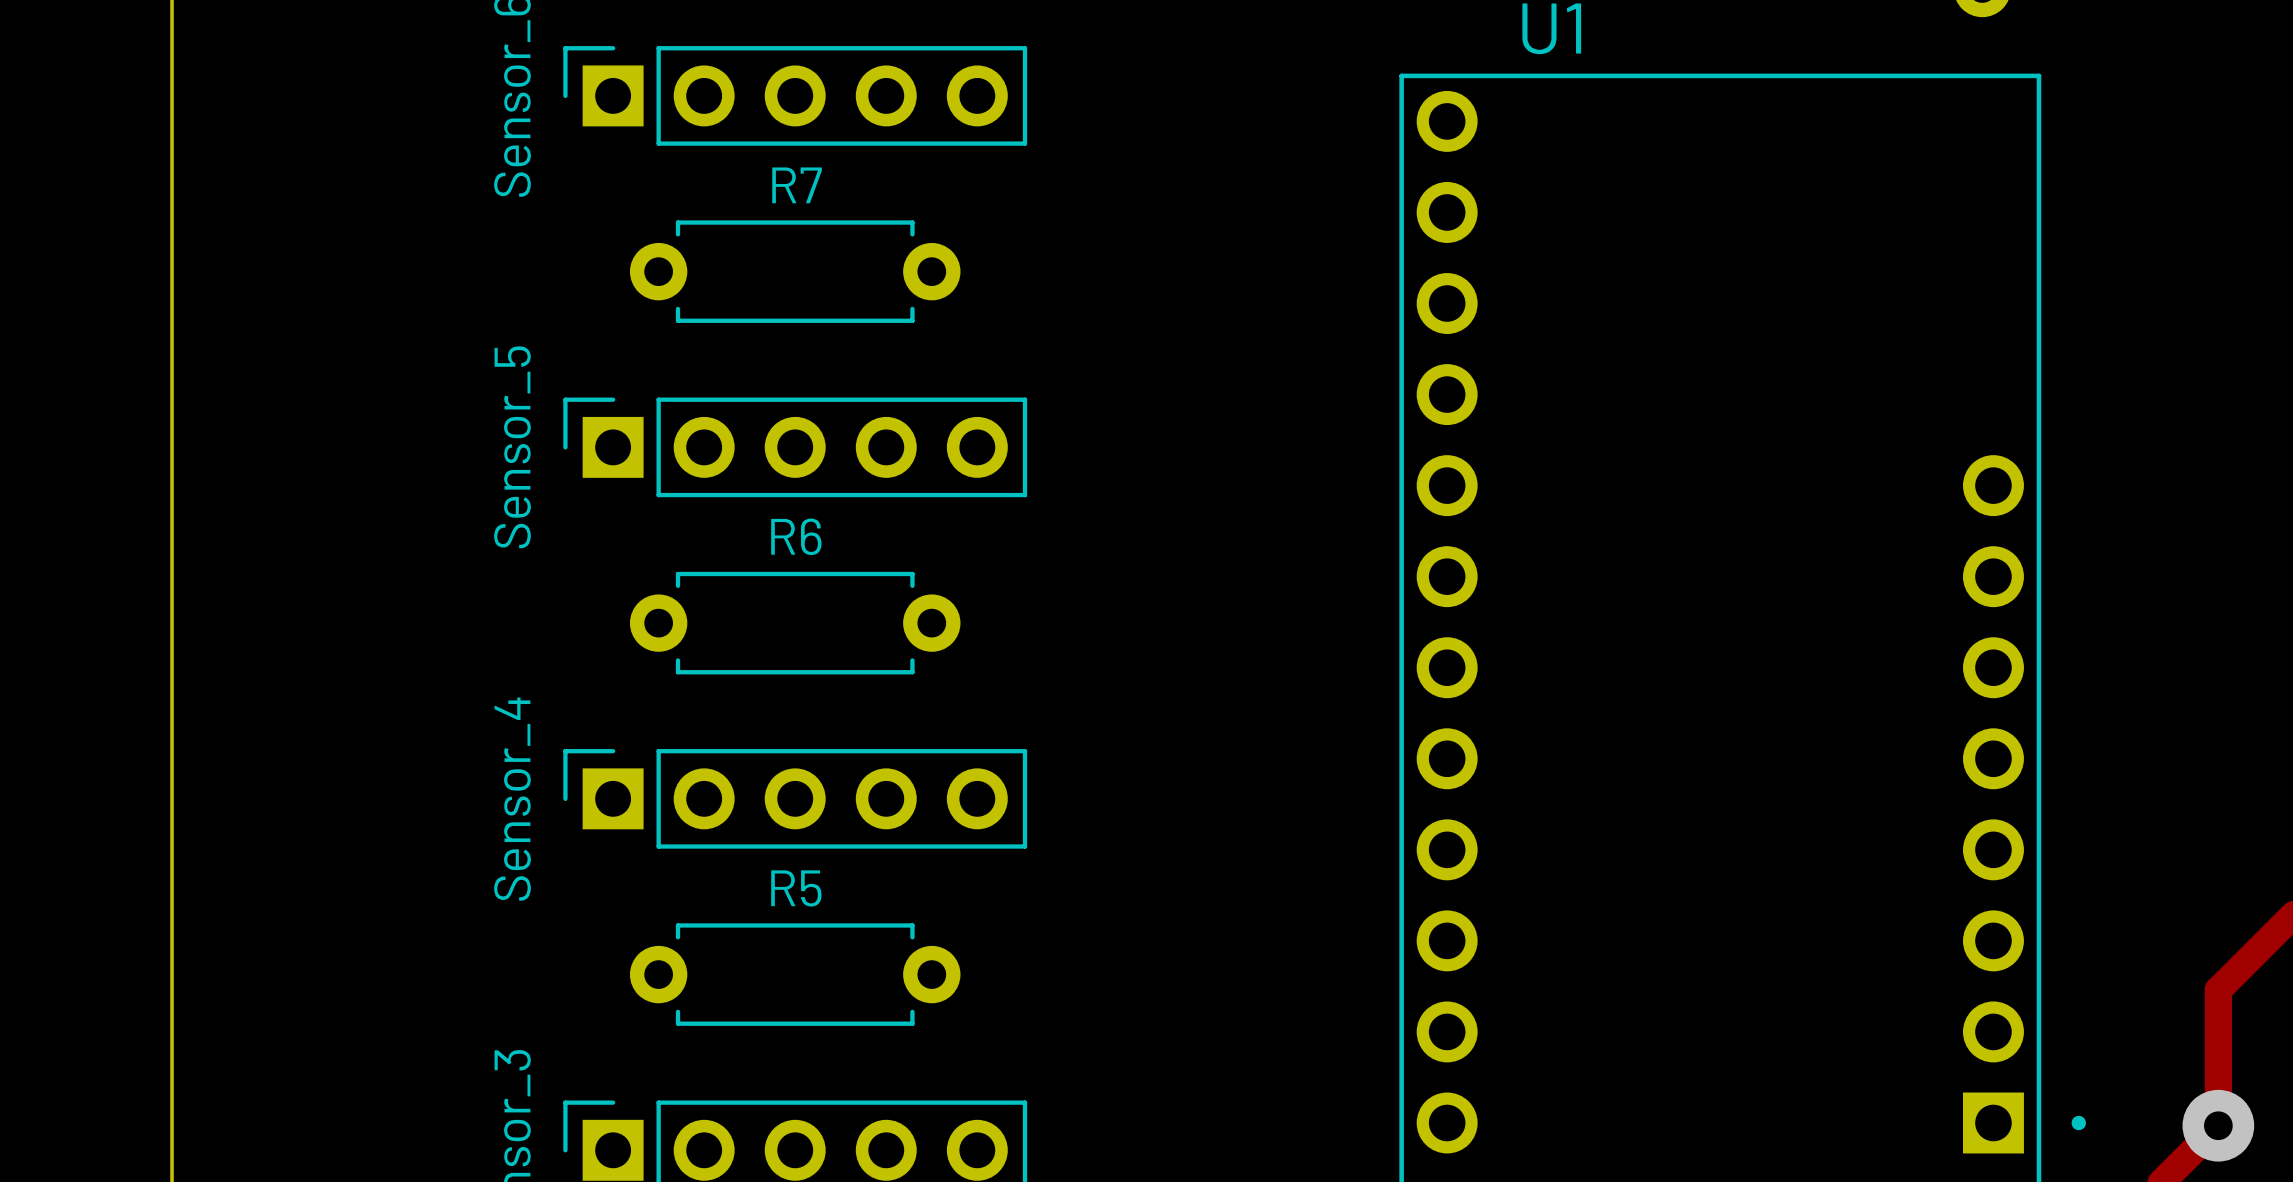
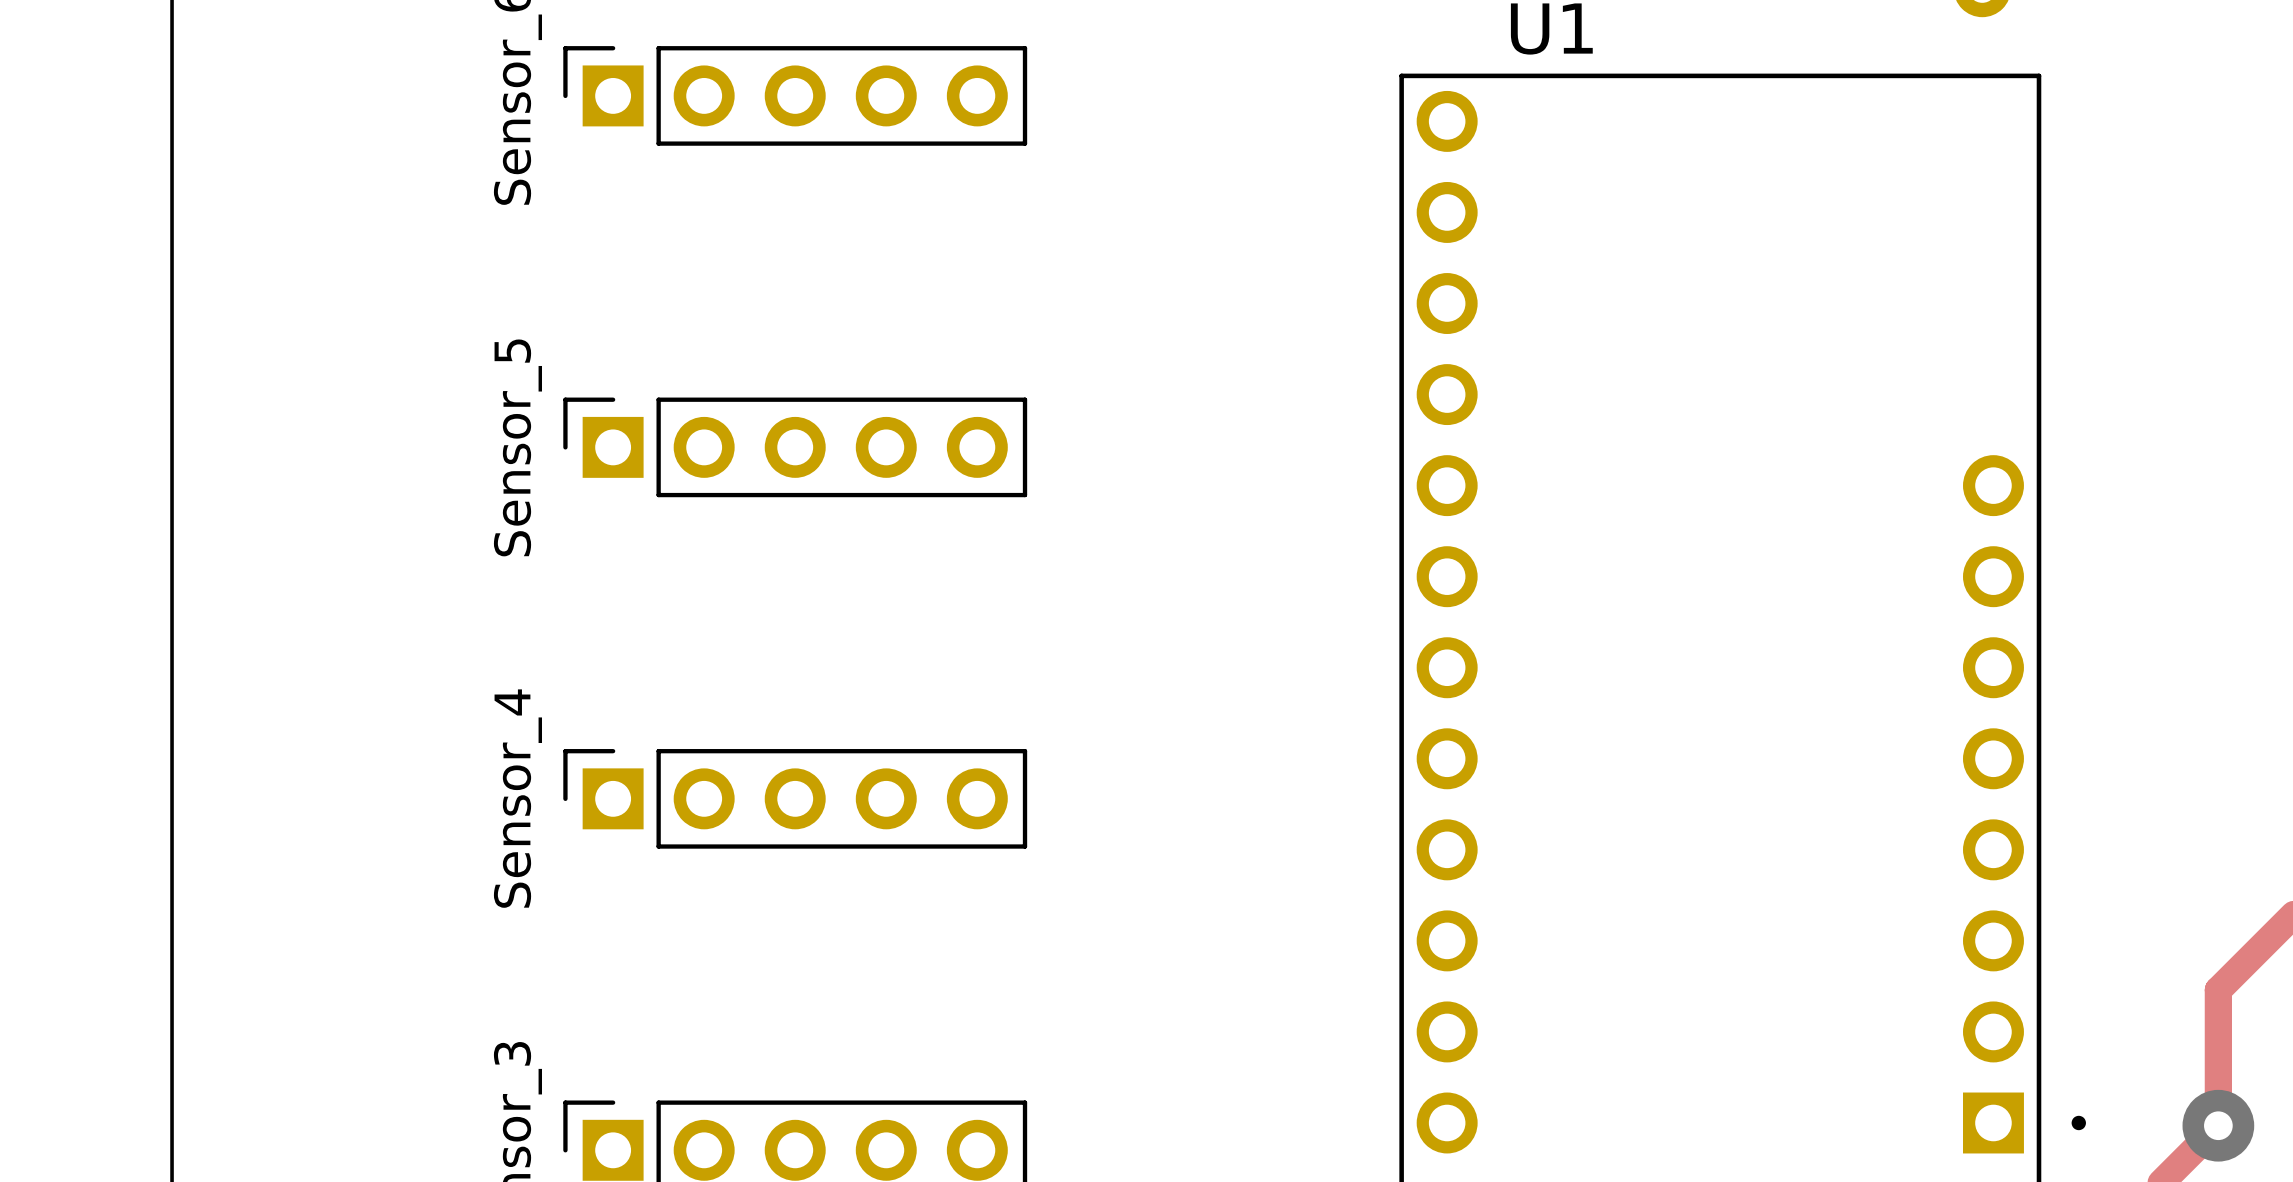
R7: (795, 271) -> none
R6: (795, 623) -> none
R5: (795, 974) -> none

